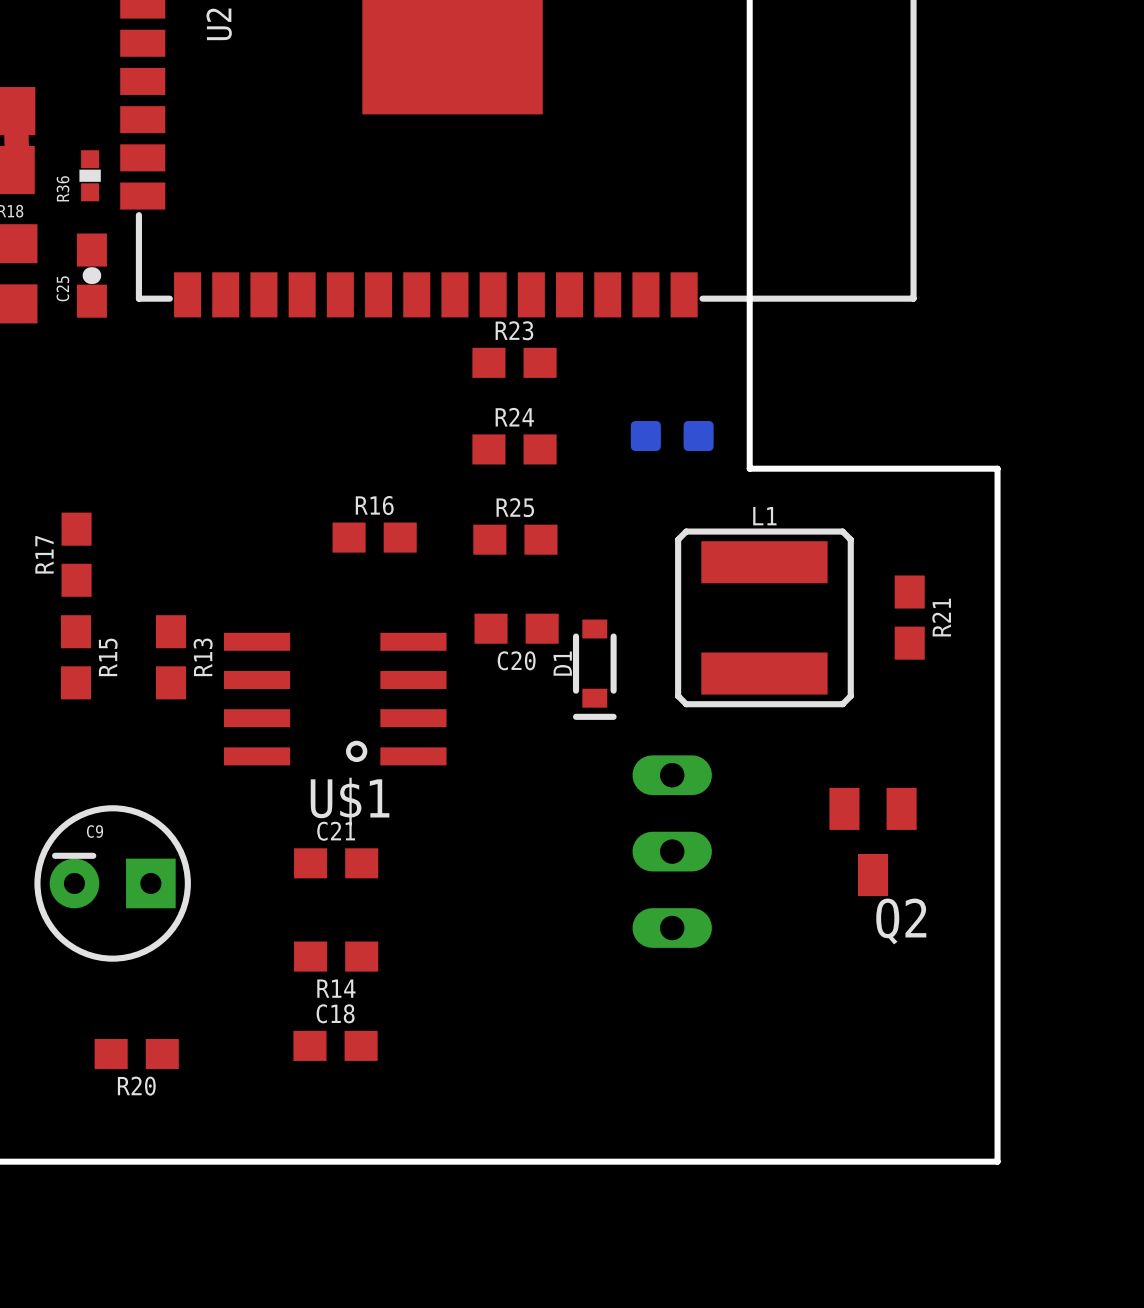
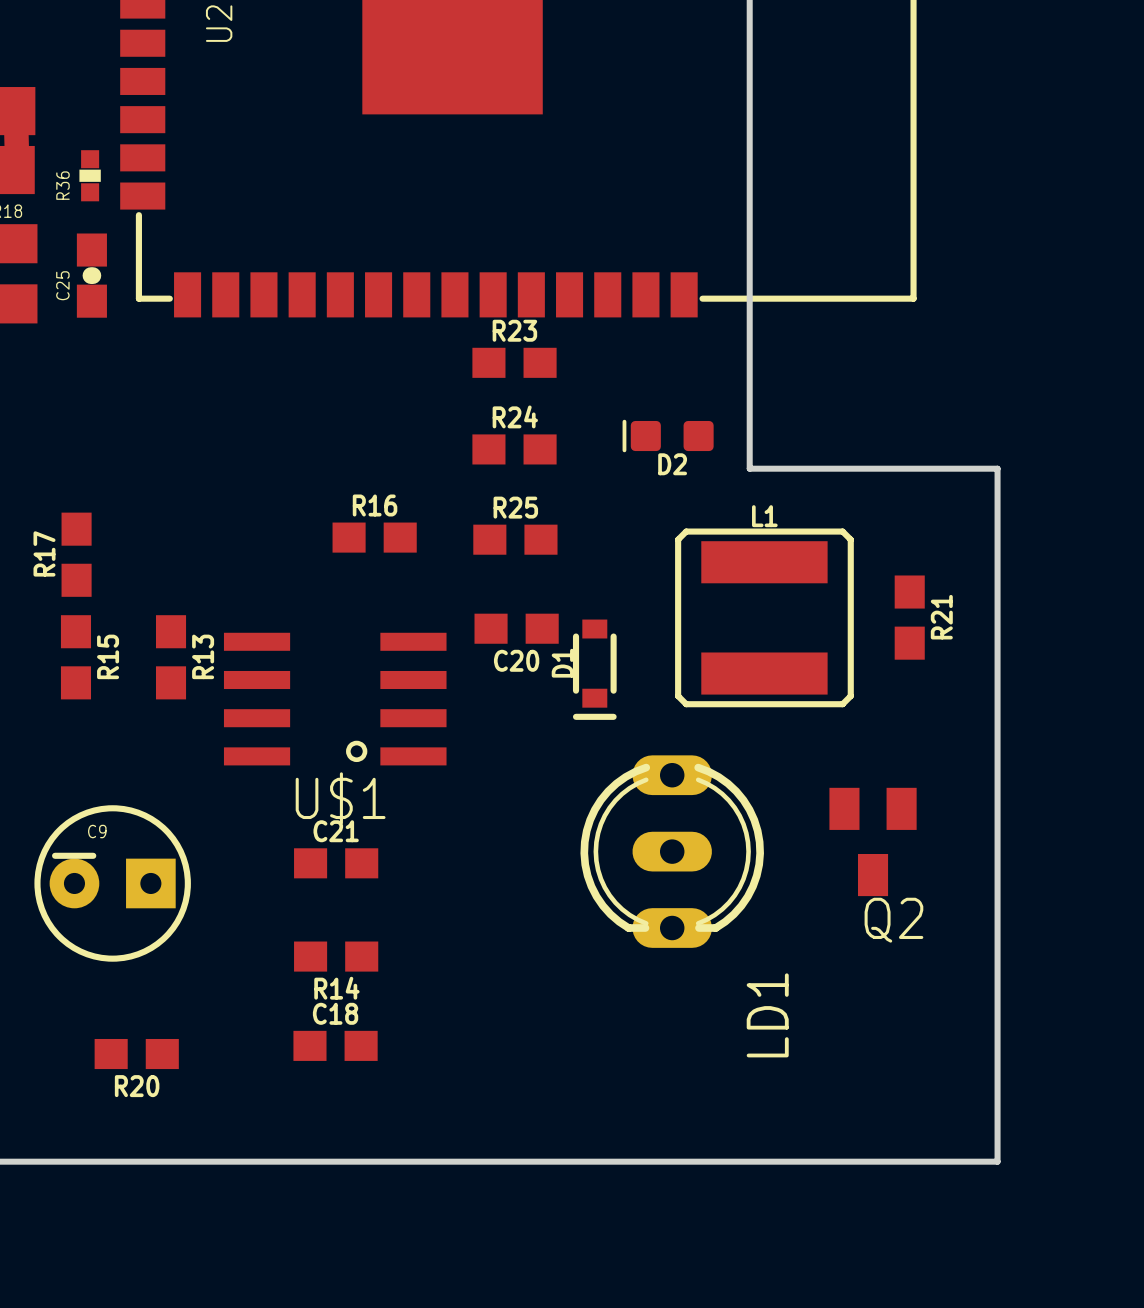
D2 side: bottom (672, 436) -> top (668, 436)
LD1 side: bottom (672, 851) -> top (672, 851)

